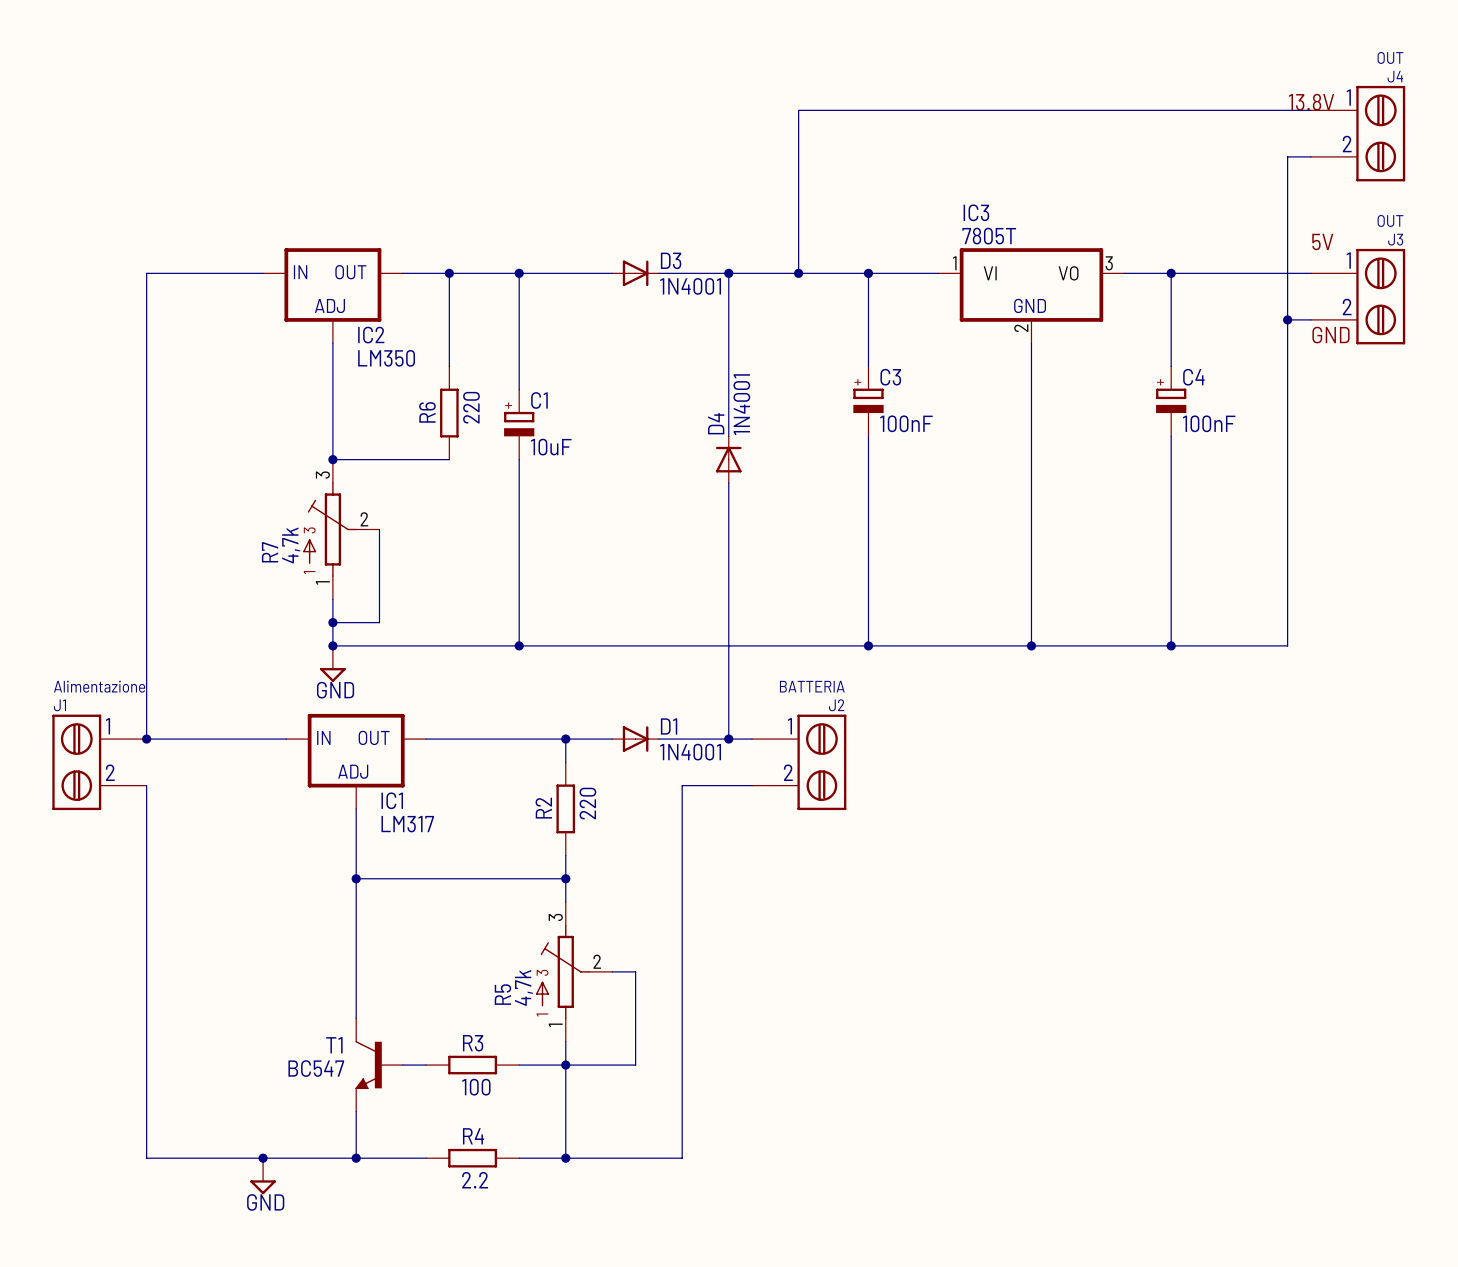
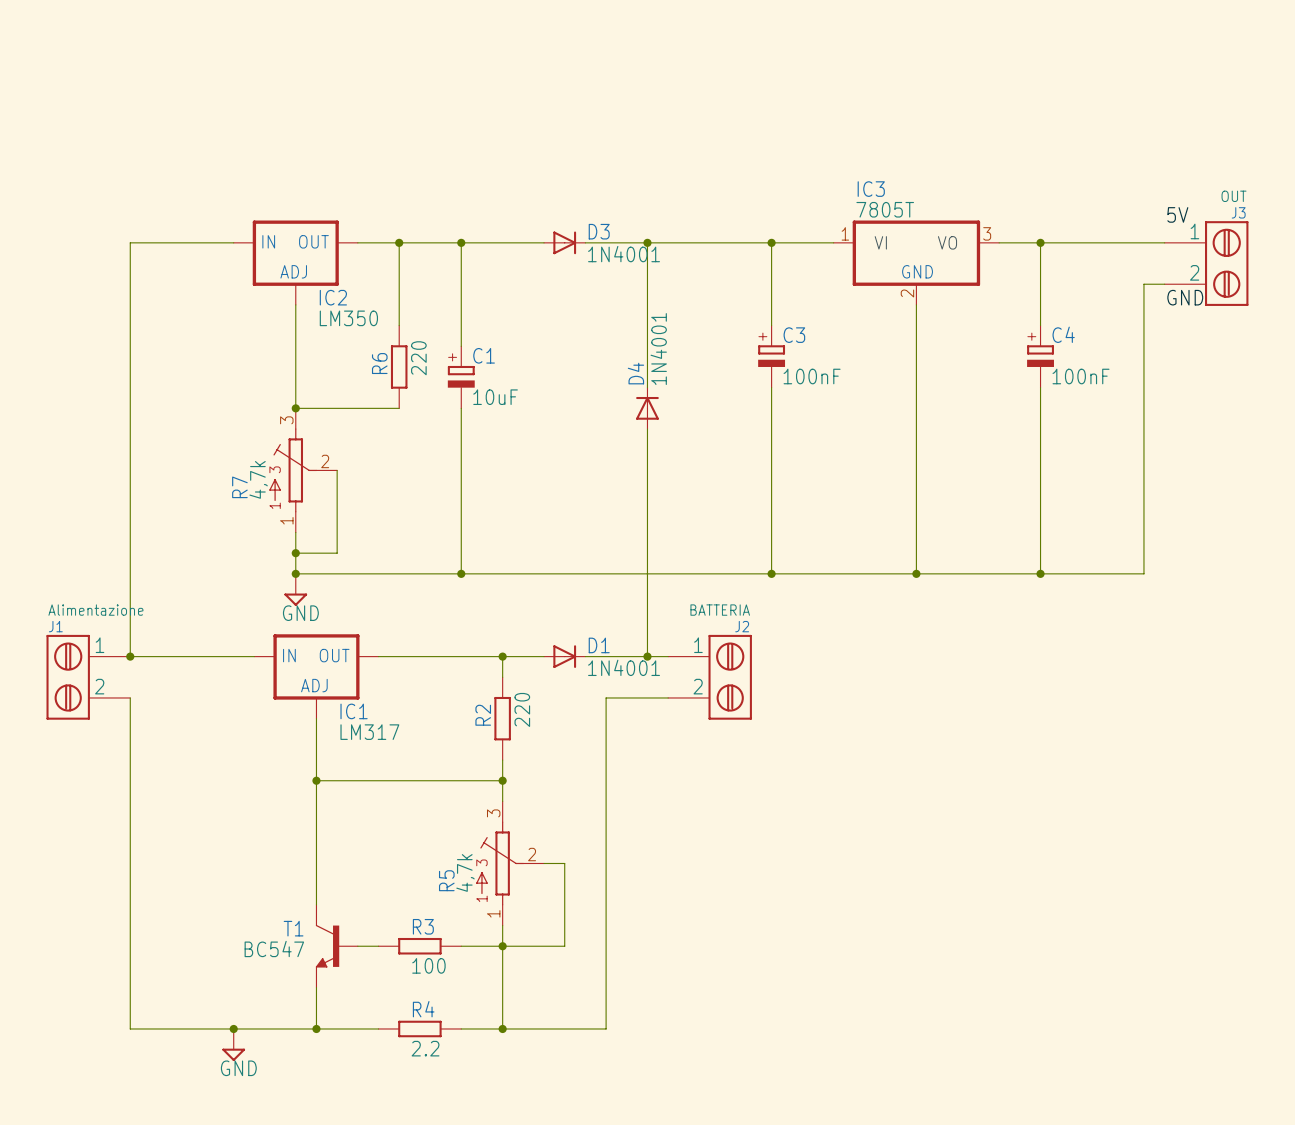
label: 13.8V (1311, 102) -> none
wire: (1310, 110) (798, 110) (798, 273) -> none
J4: OUT (1358, 133) -> none
wire: (1310, 156) (1287, 156) (1287, 319) -> none
junction: (798, 273) -> none
junction: (1287, 319) -> none

